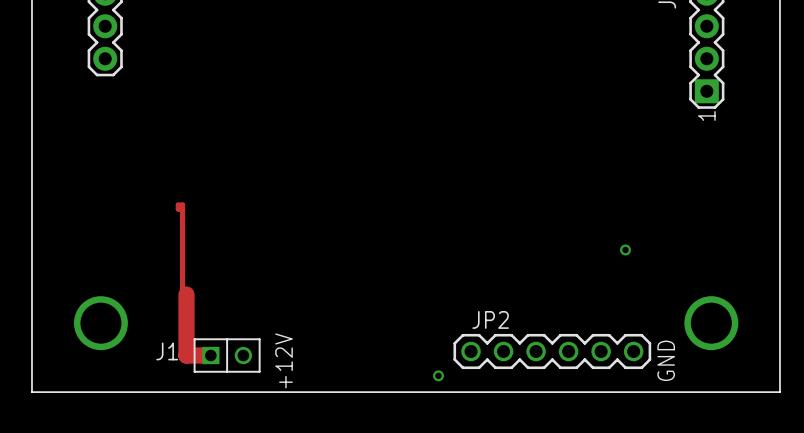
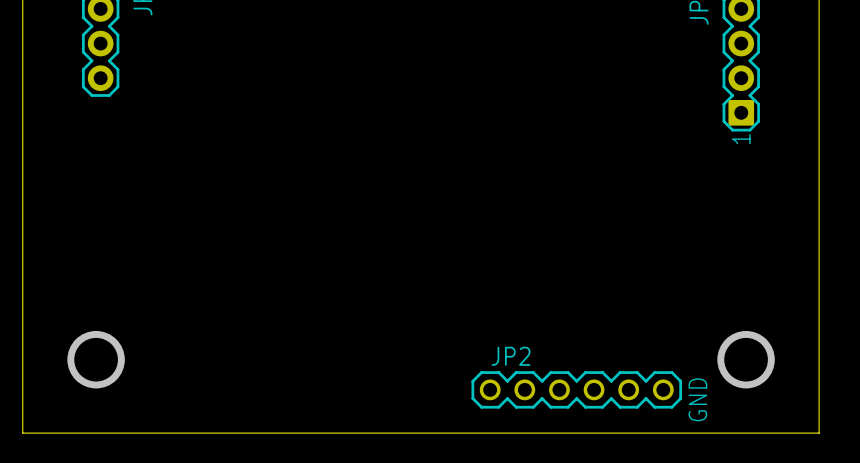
track: (182, 209) (178, 209) (178, 205) (182, 205) (182, 294) (186, 294) (186, 355) (210, 355) -> none
via: (625, 249) -> none
J1: (227, 355) -> none
text: +12V (284, 360) -> none
via: (438, 375) -> none

